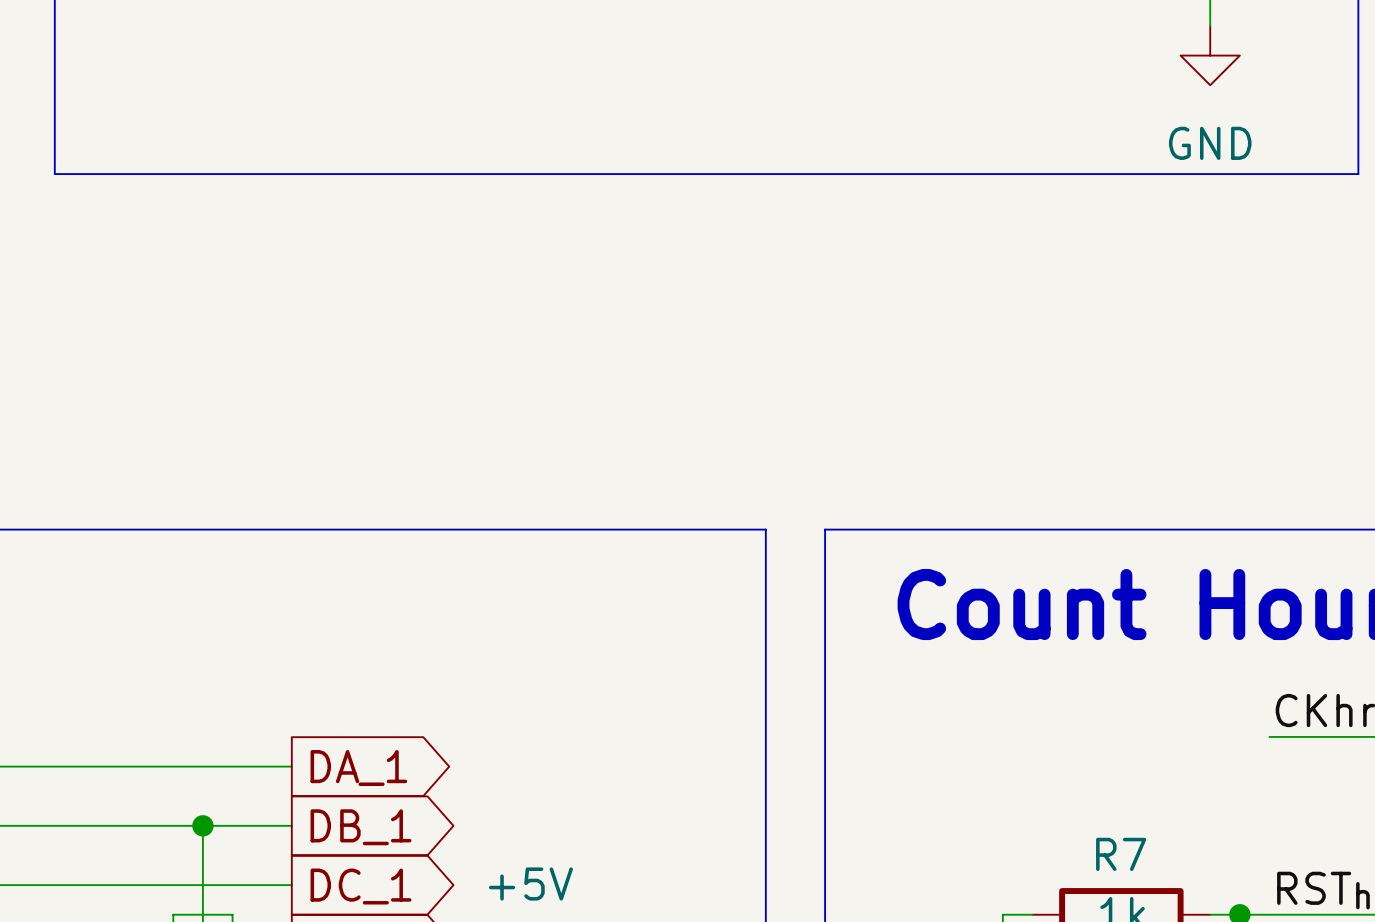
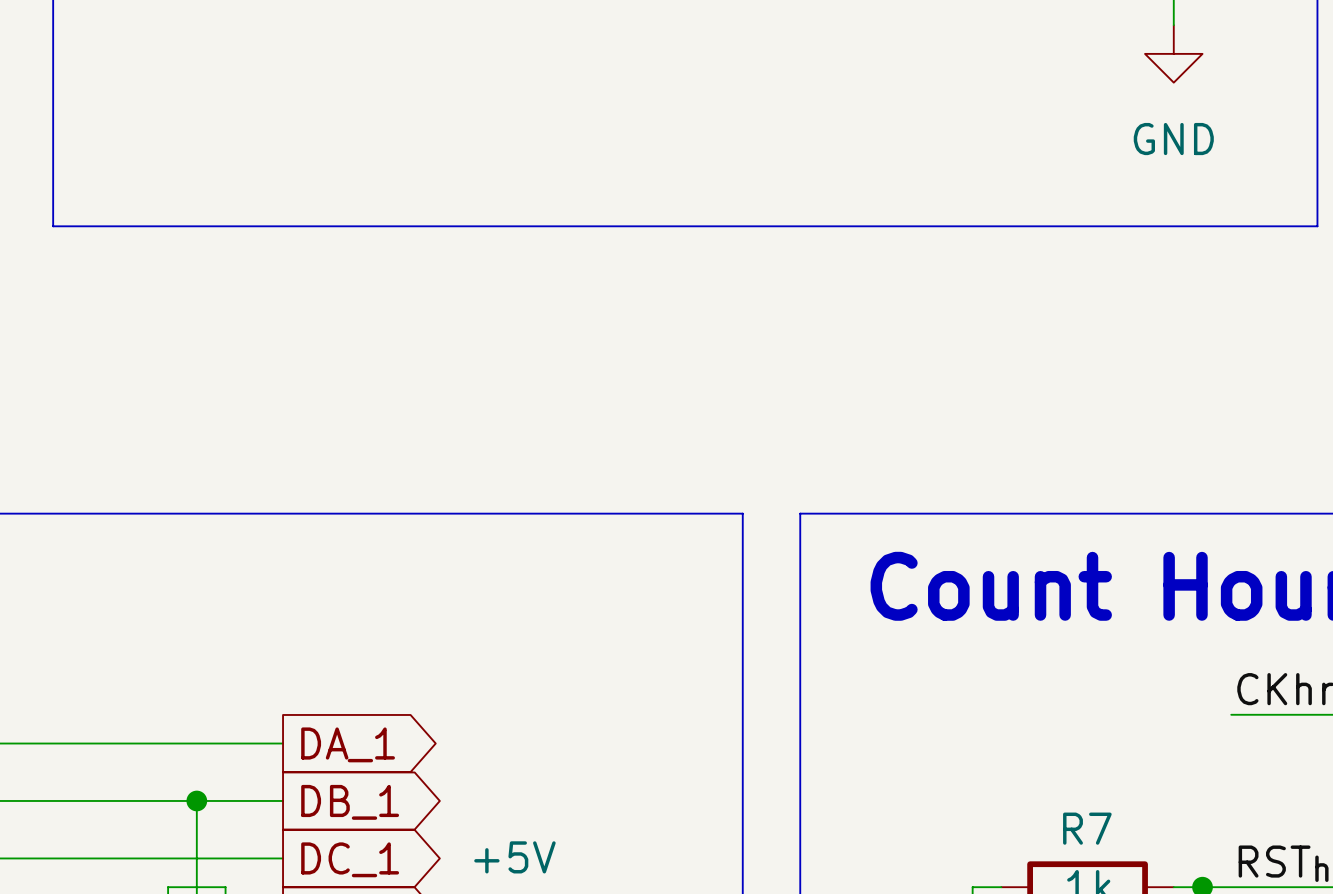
line: (54, 174) (1358, 174) -> (53, 168) (53, 226) (1317, 226) (1317, 168)

